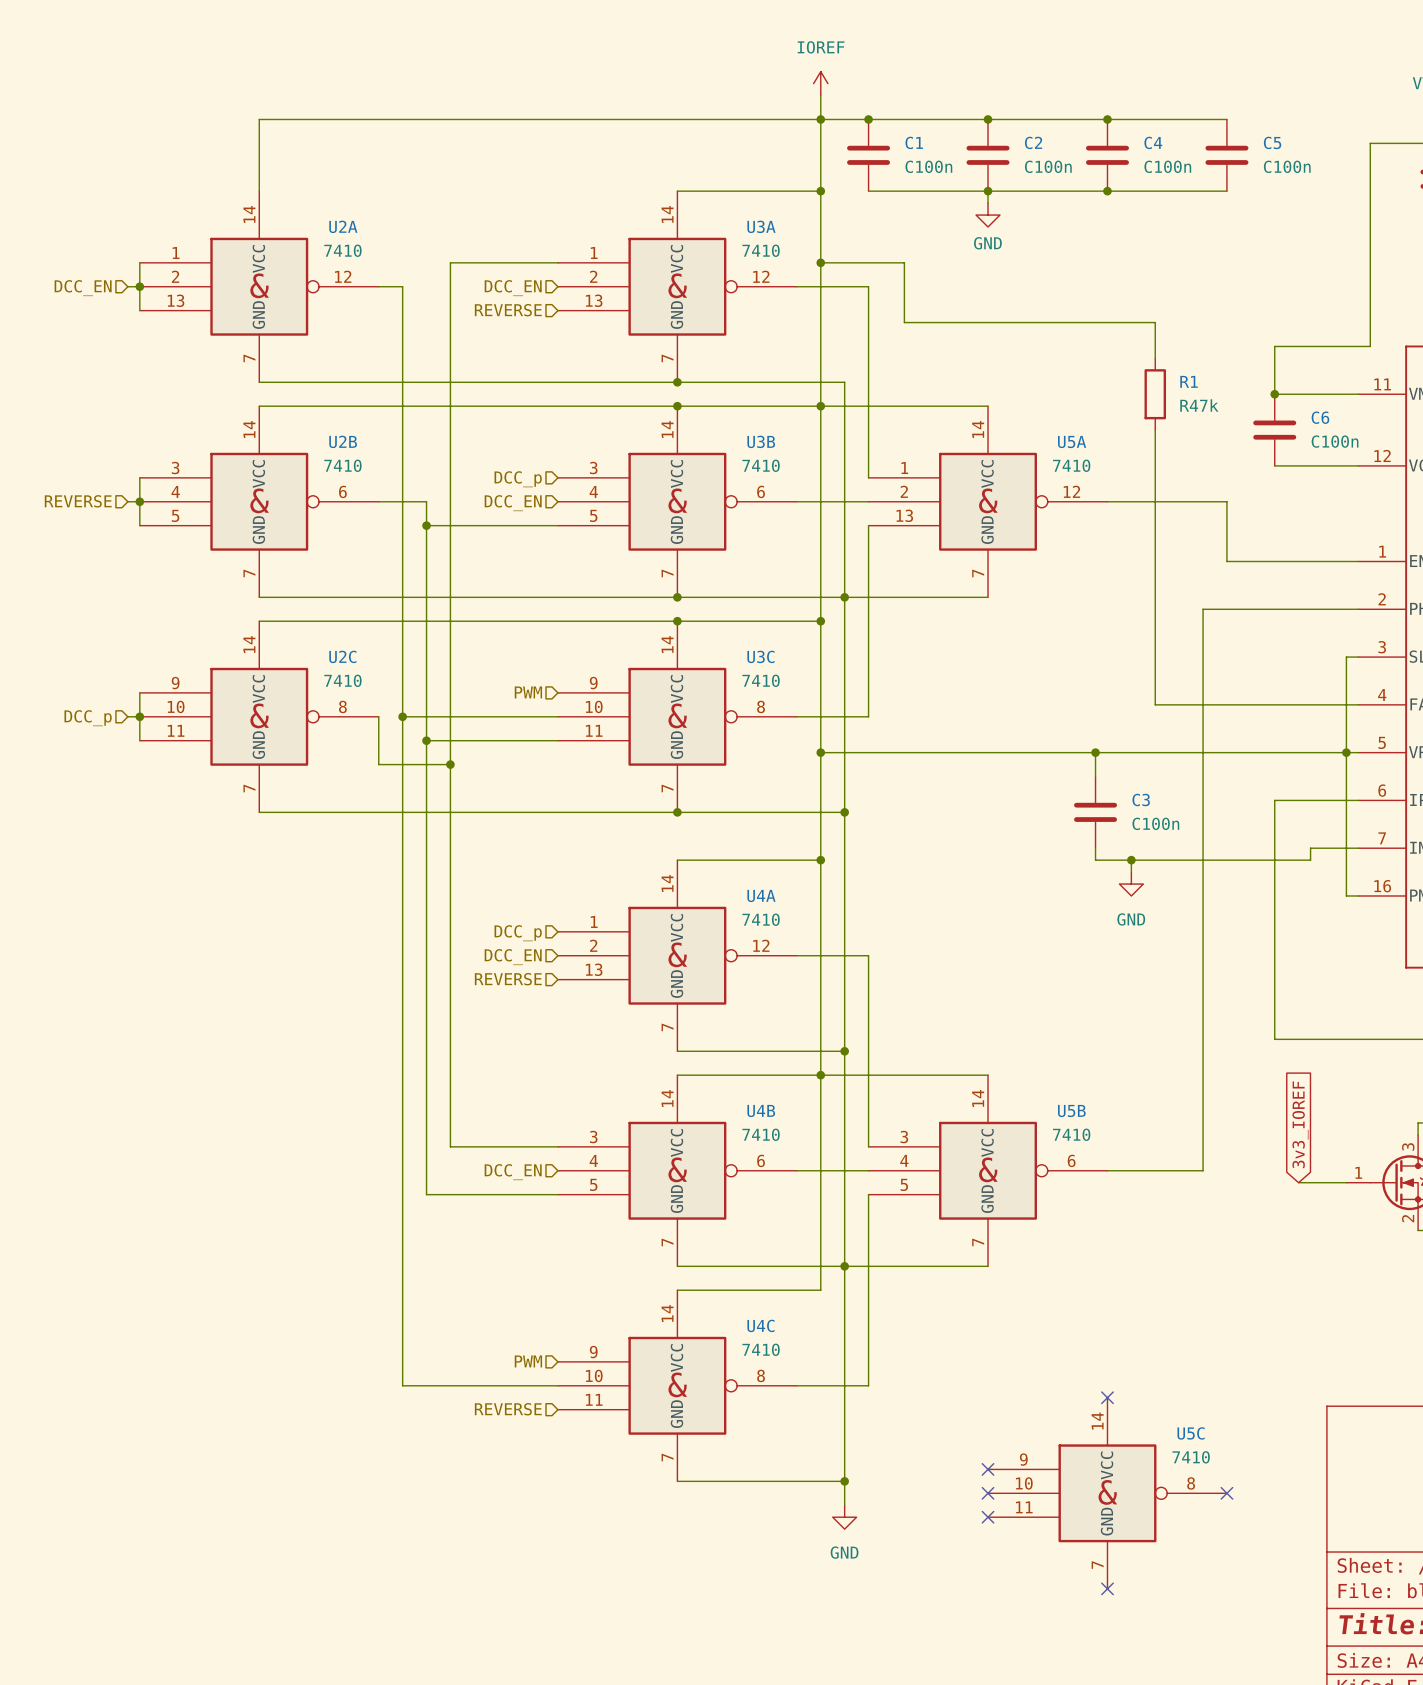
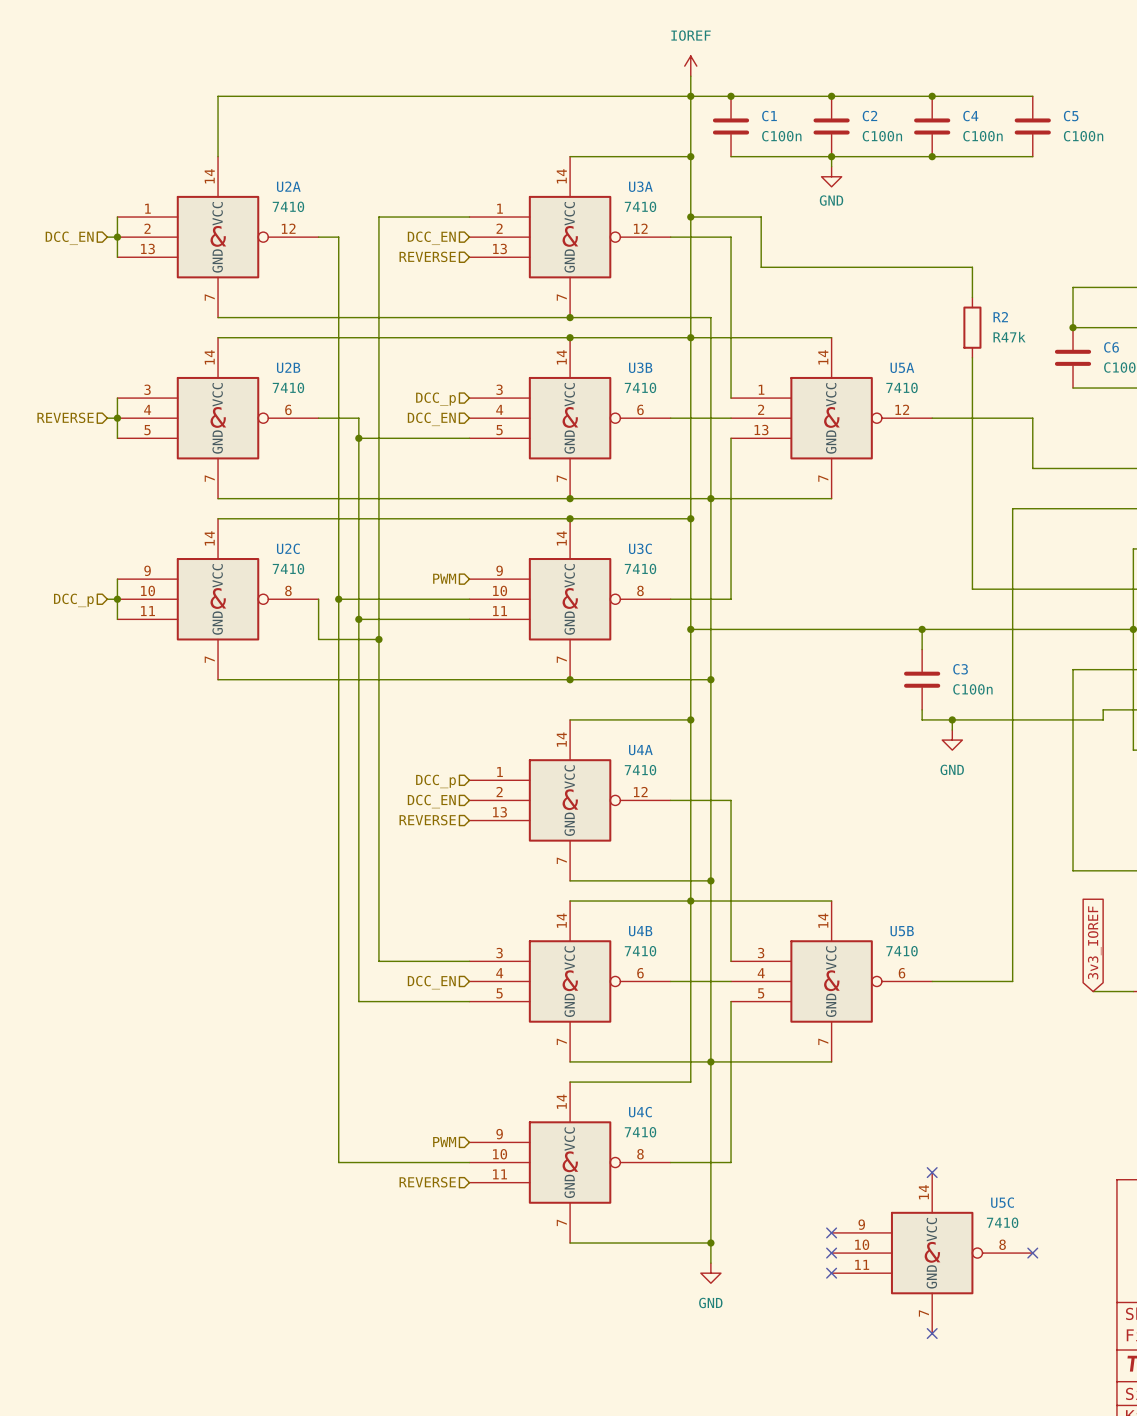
R1 name: R1 (1189, 381) -> R2 (1000, 317)

